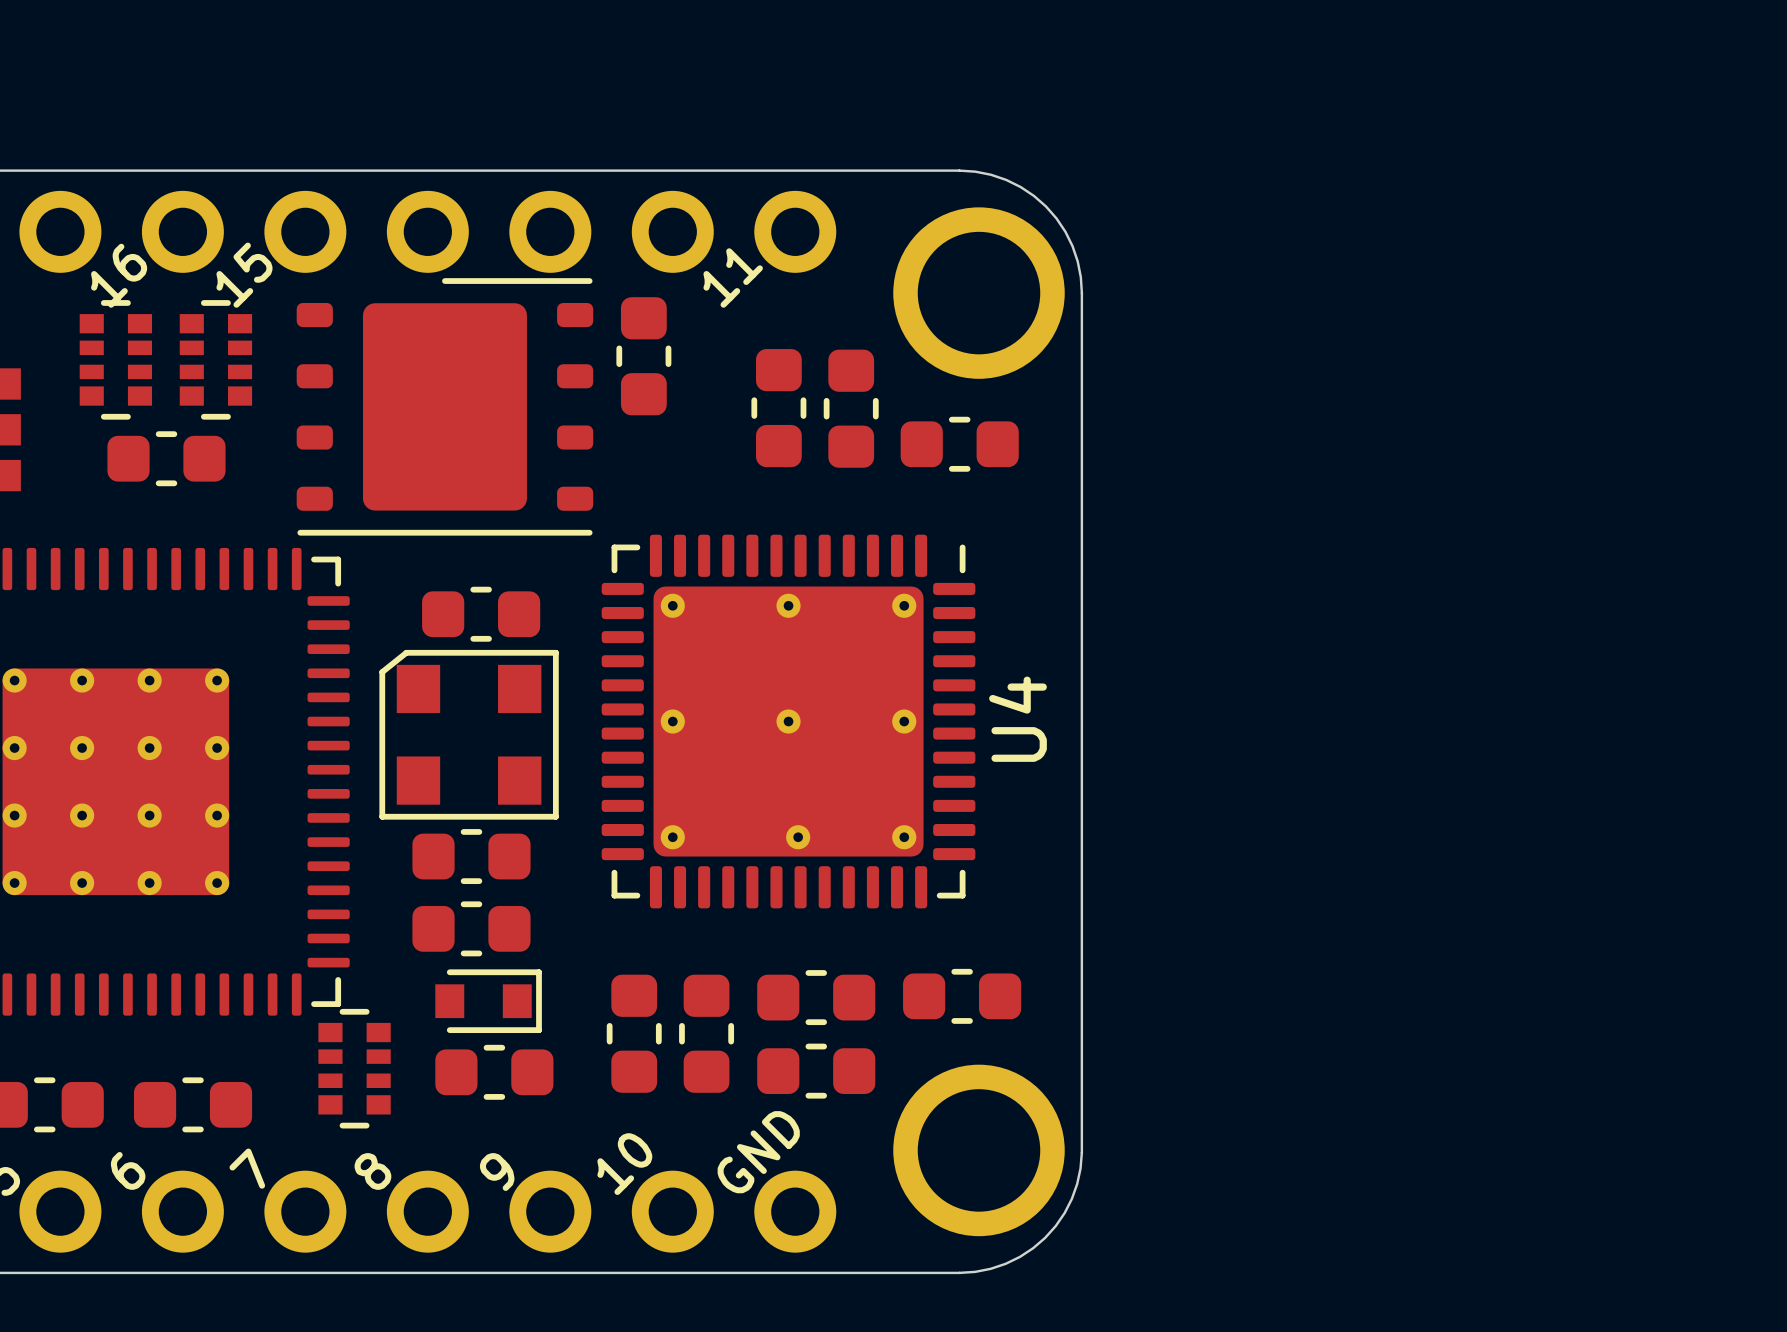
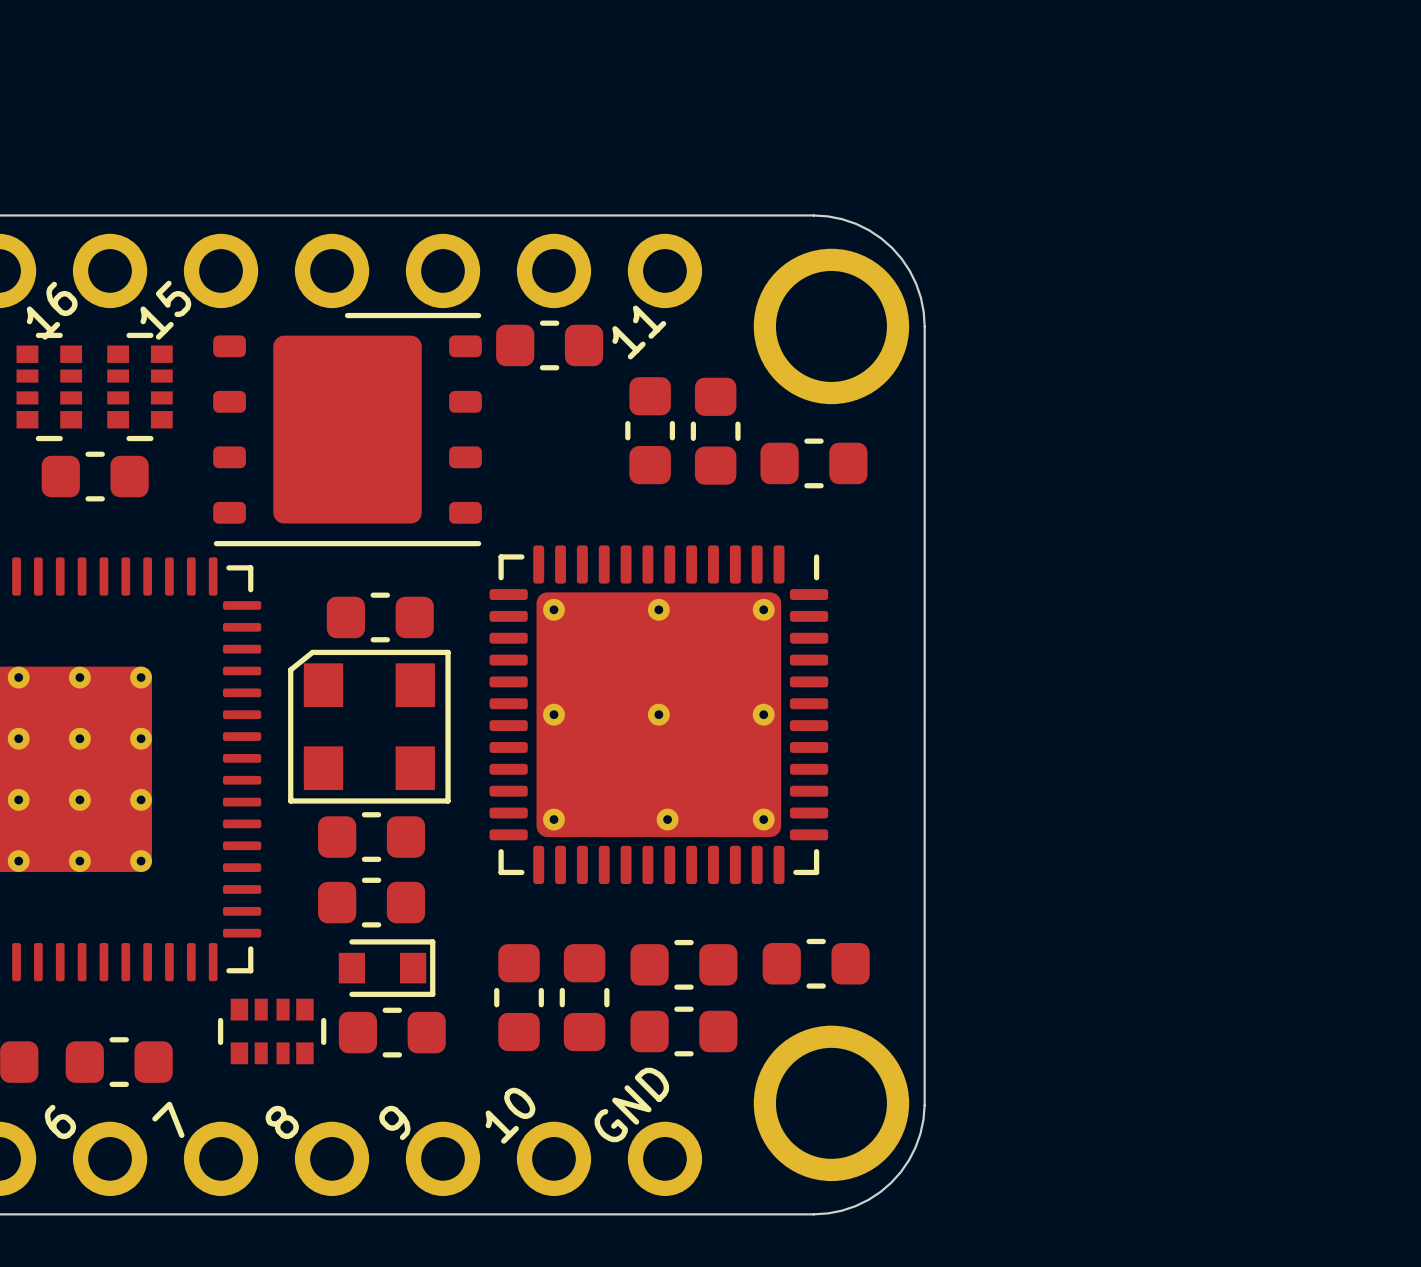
text position: 11 (733, 278) -> 11 (639, 332)
part rotation: 0° (643, 356) -> 90° clockwise (549, 345)
U4 name: U4 (1018, 719) -> none
part rotation: 0° (354, 1068) -> 90° clockwise (272, 1031)

